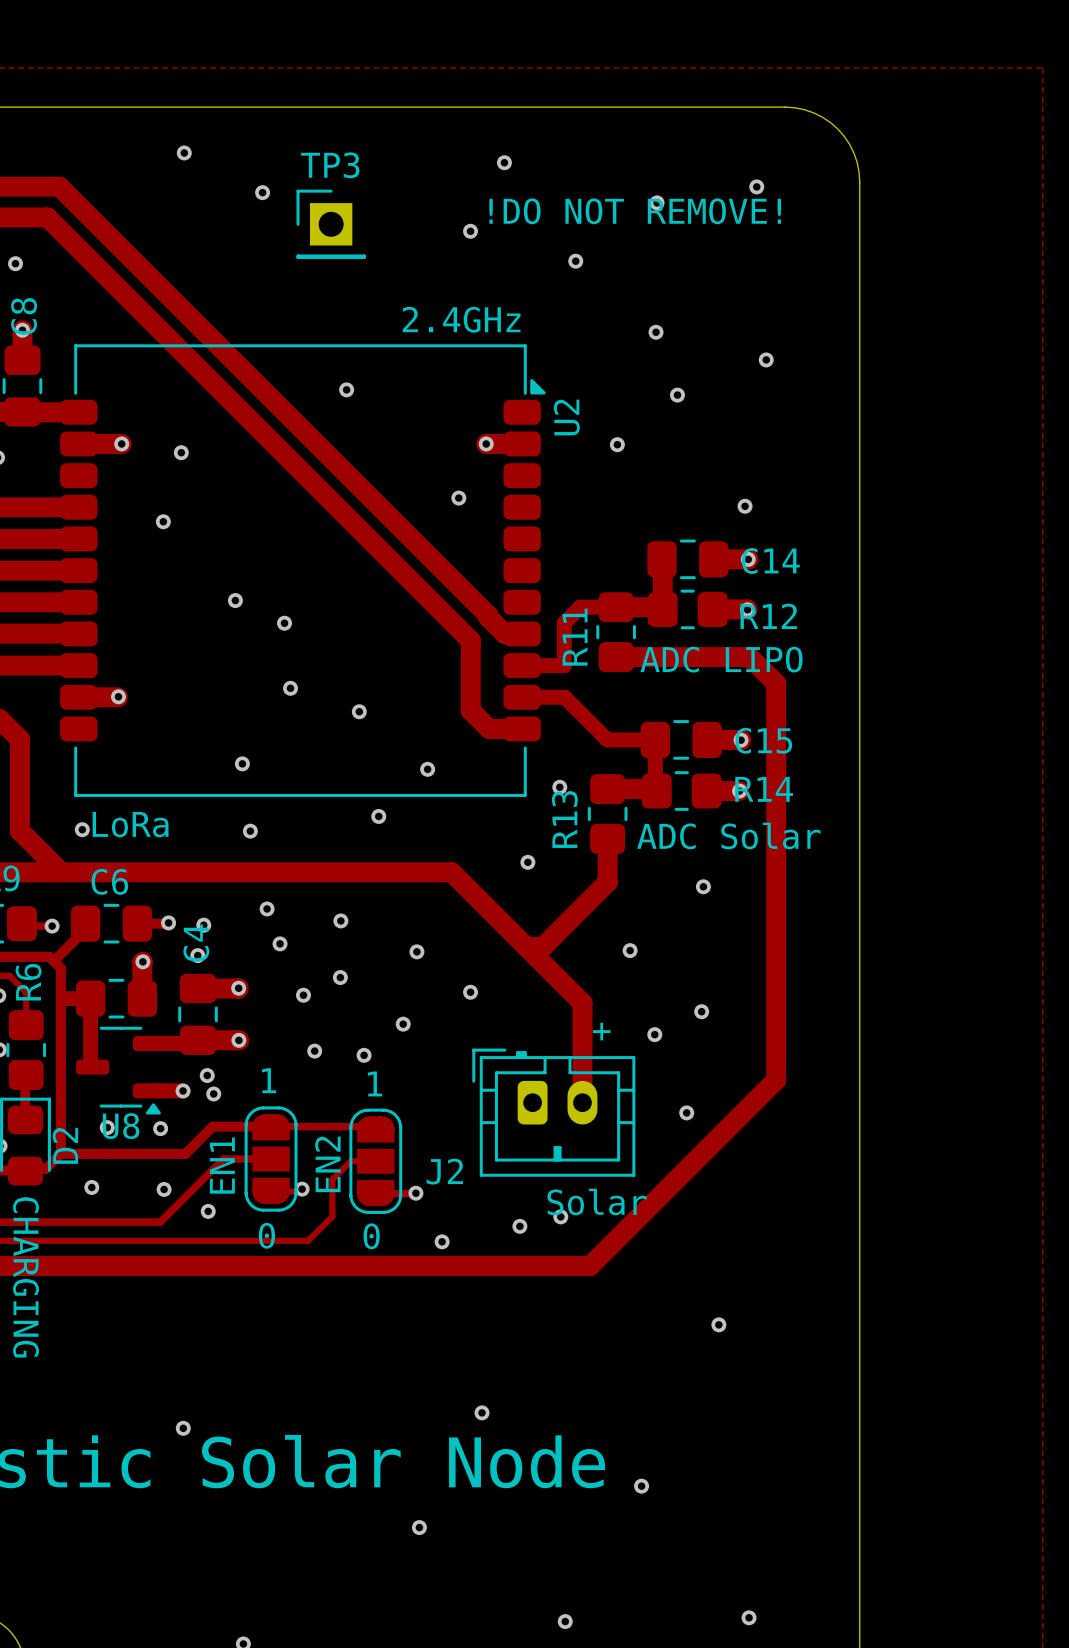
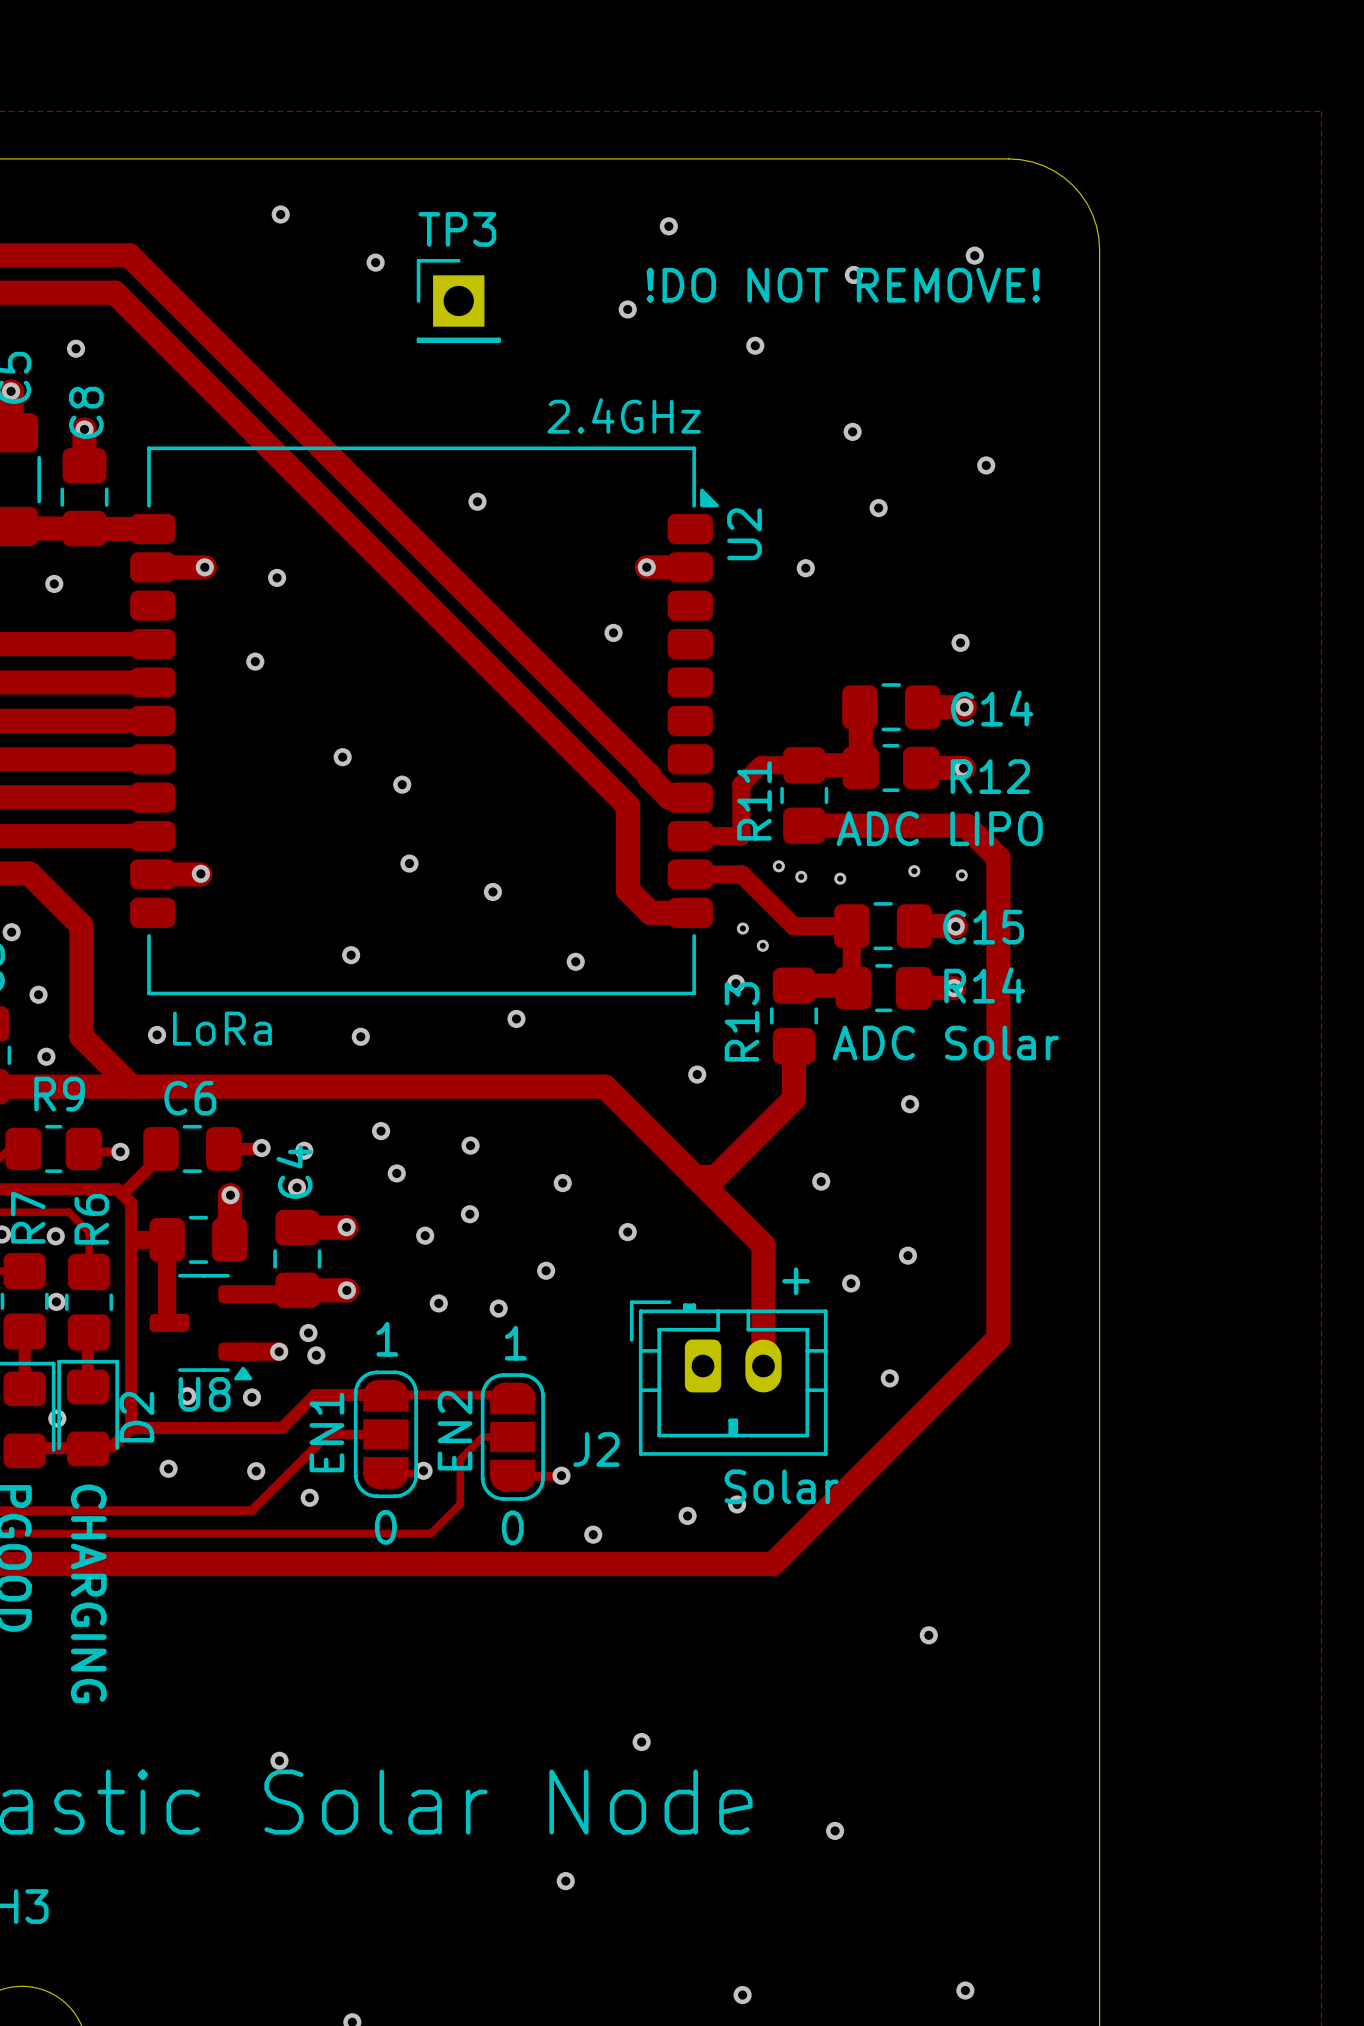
via: none -> (778, 866)
via: none -> (914, 871)
via: none -> (961, 875)
via: none -> (801, 876)
via: none -> (840, 878)
via: none -> (742, 928)
via: none -> (762, 945)

